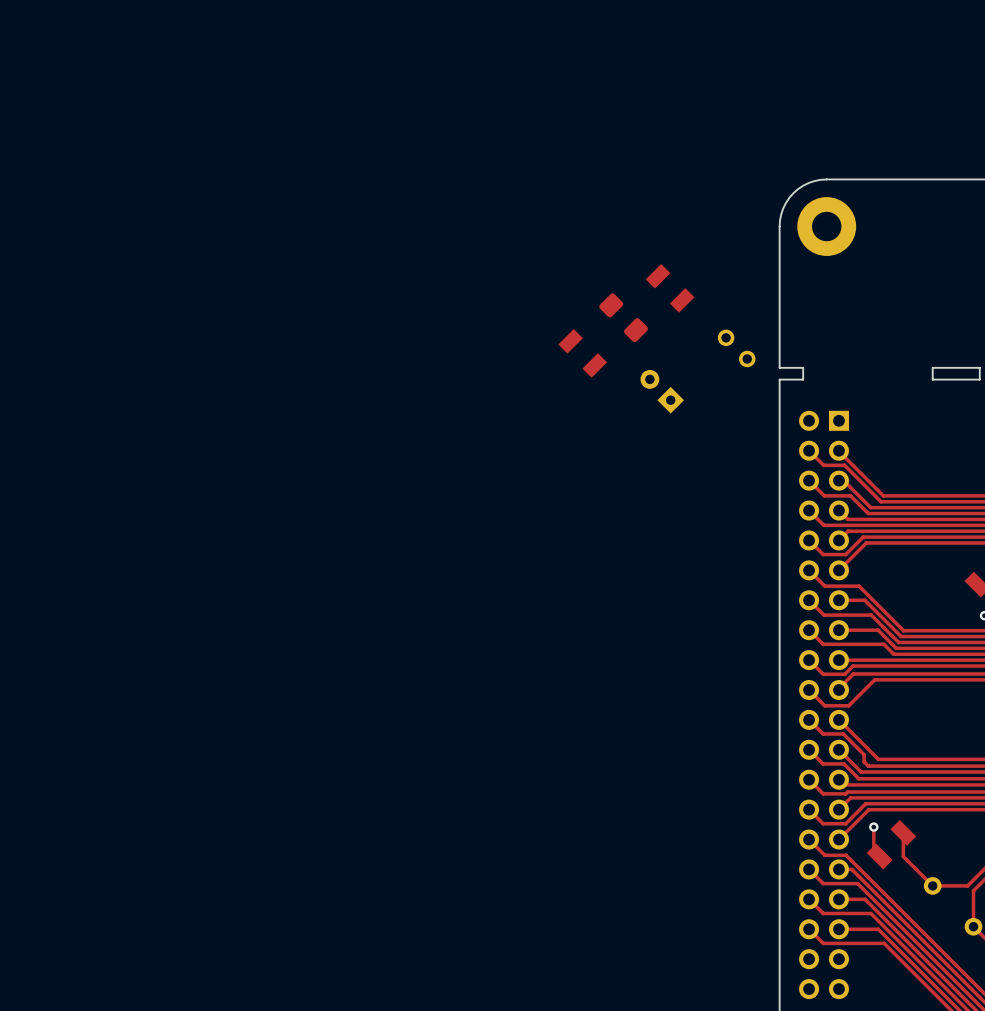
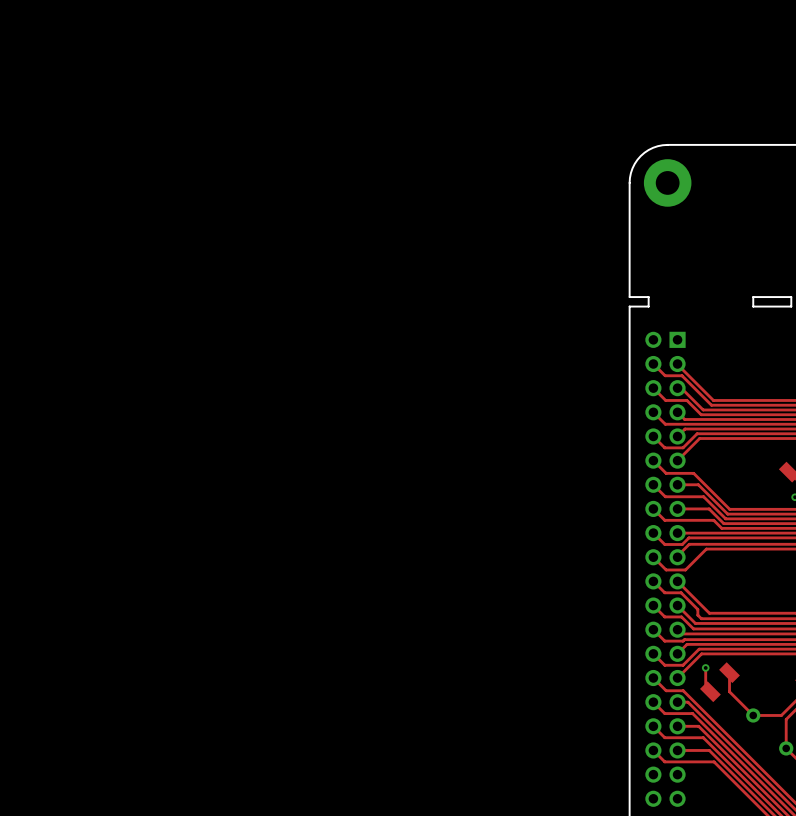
part: (670, 288) -> none
part: (623, 317) -> none
part: (736, 348) -> none
part: (582, 353) -> none
part: (662, 391) -> none

